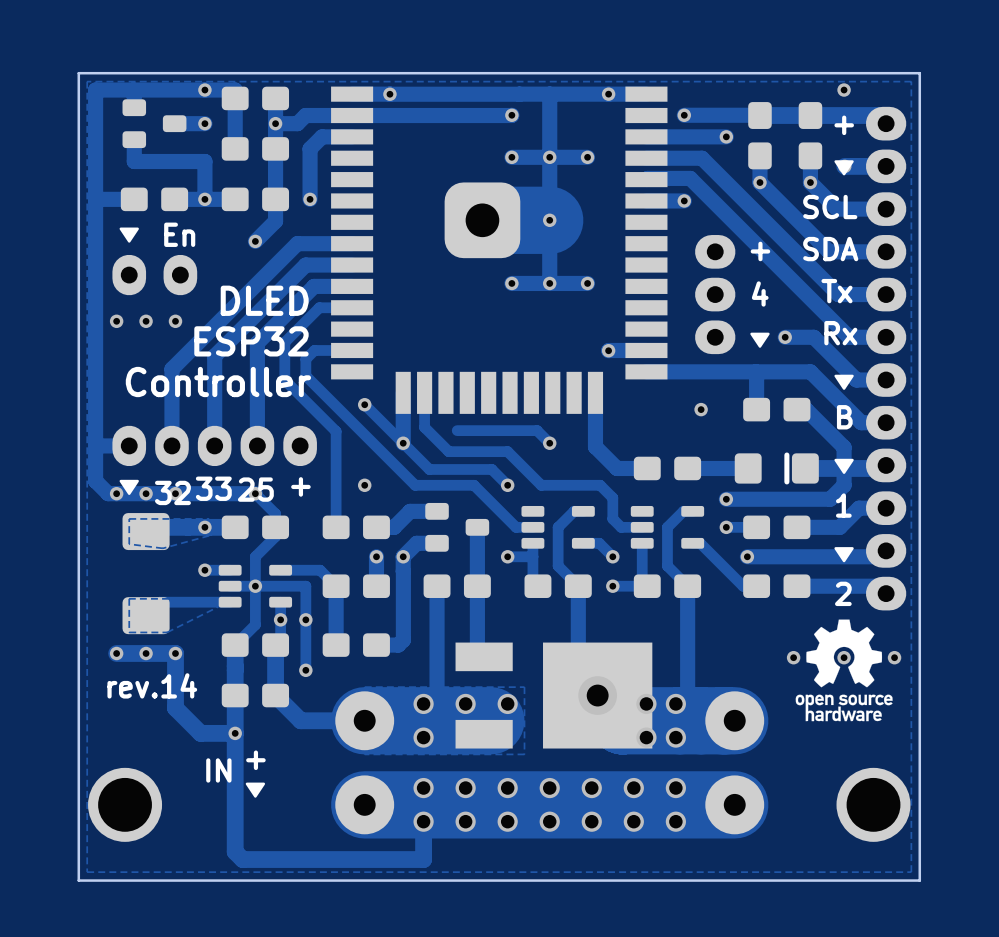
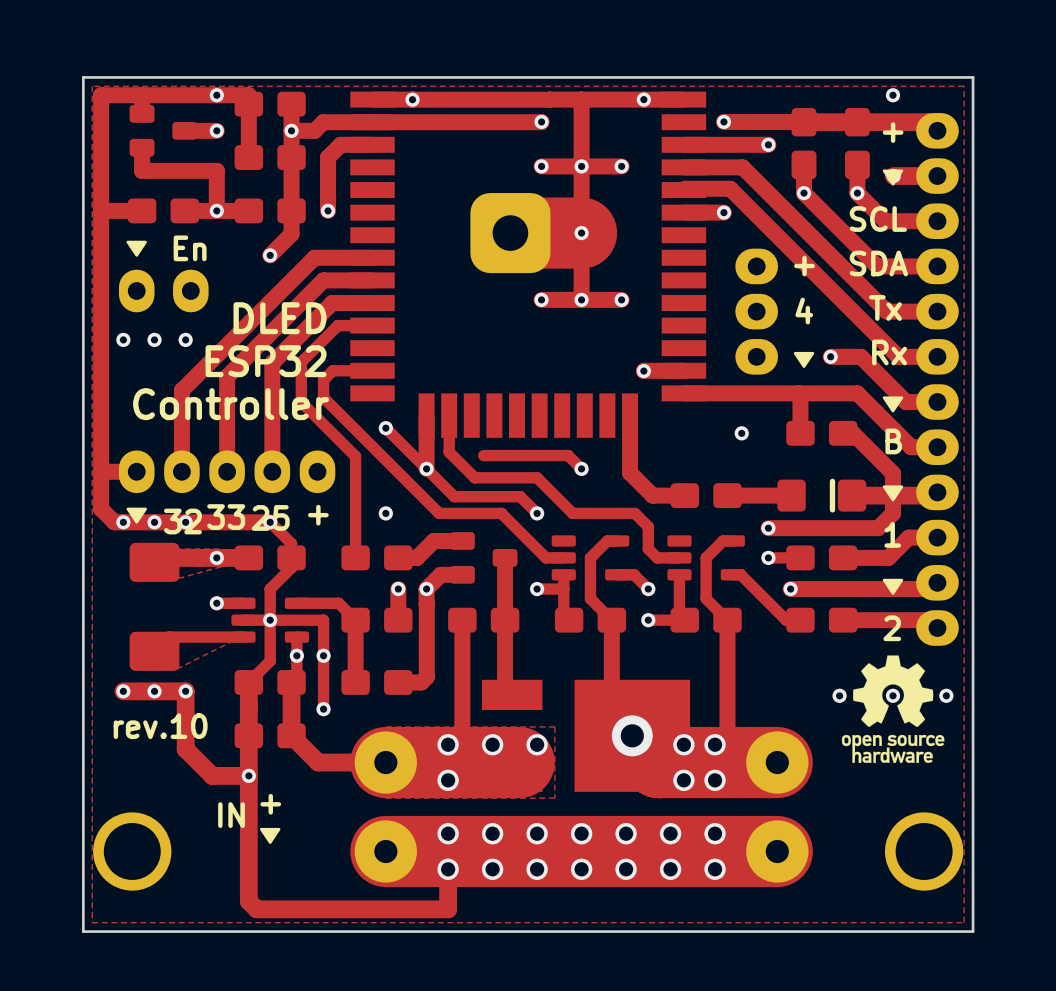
text: rev.14 (152, 685) -> rev.10 (160, 726)

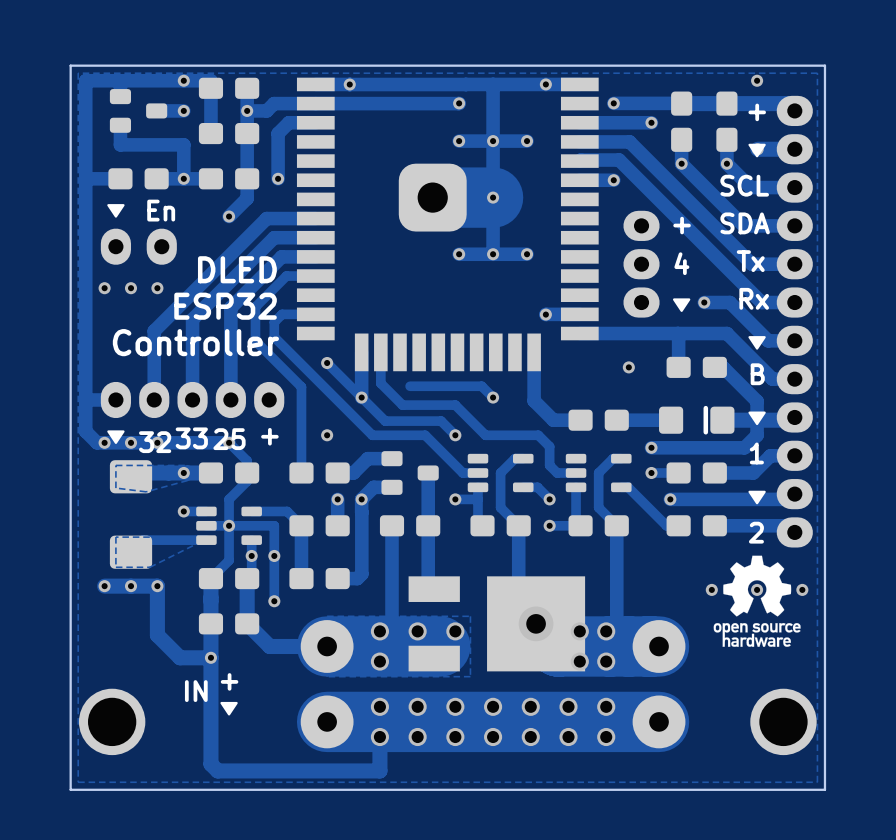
text: rev.10 (160, 726) -> none

